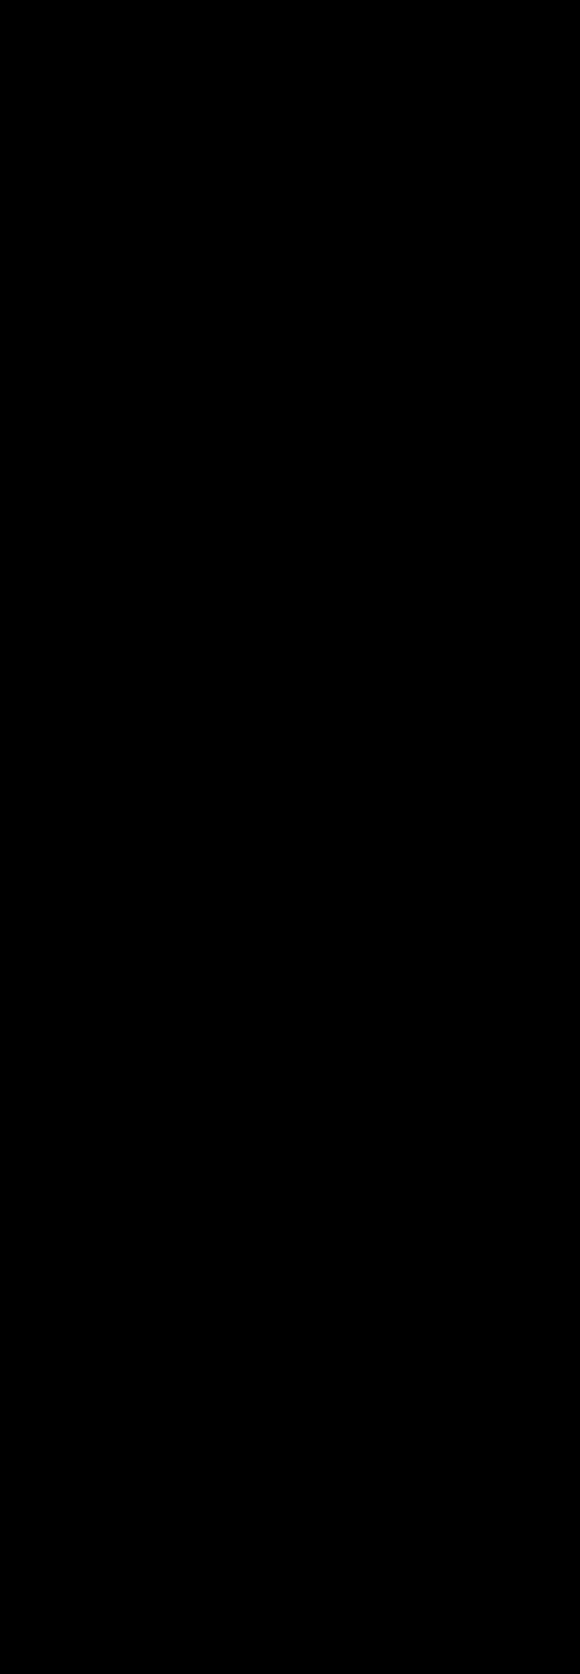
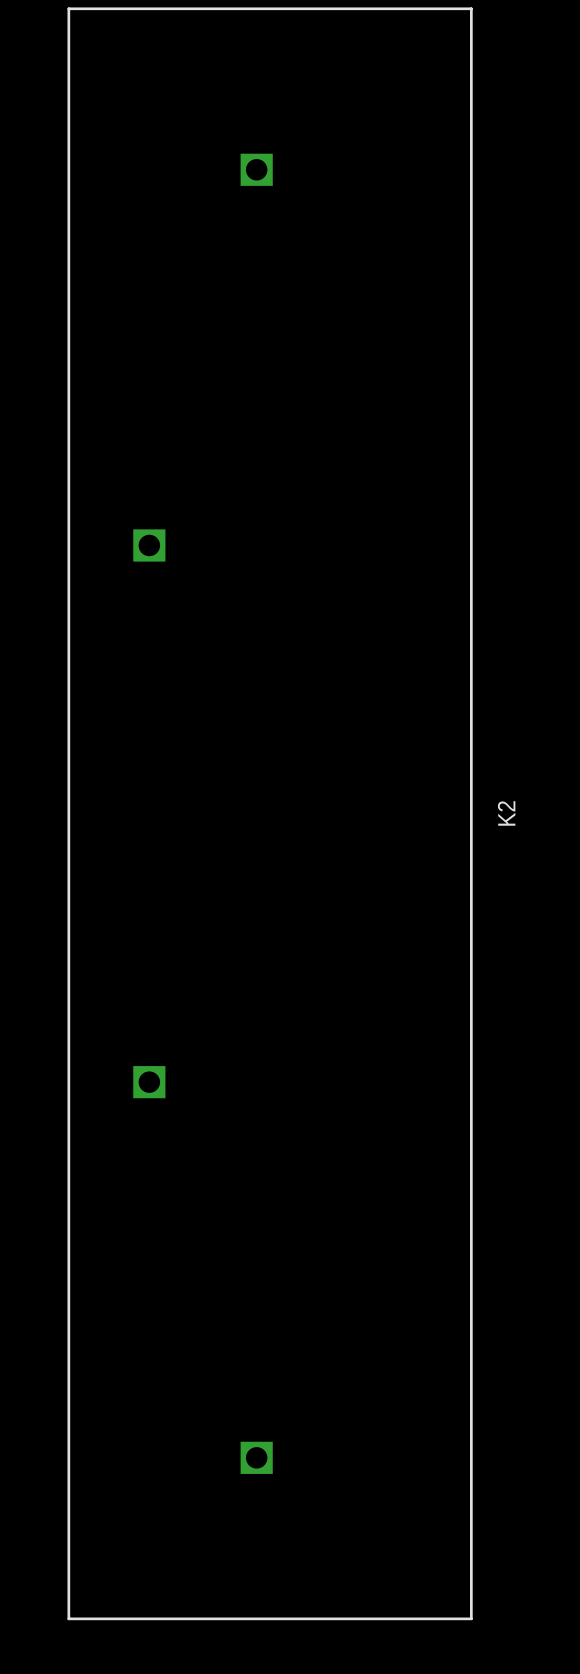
K2: none -> (270, 813)

